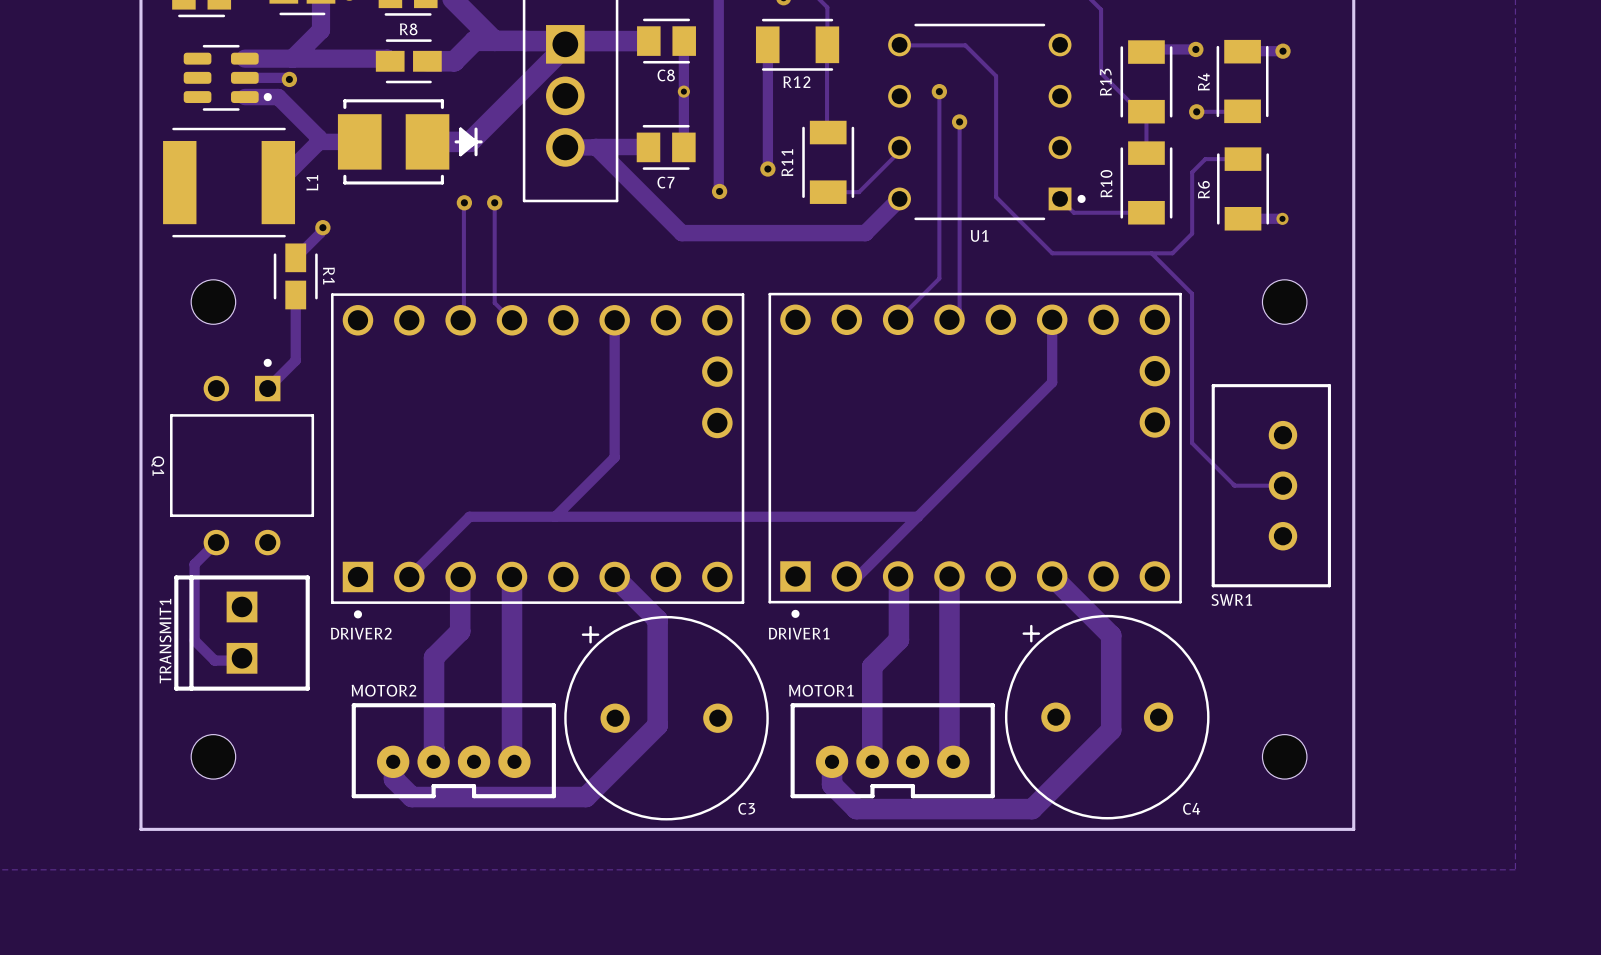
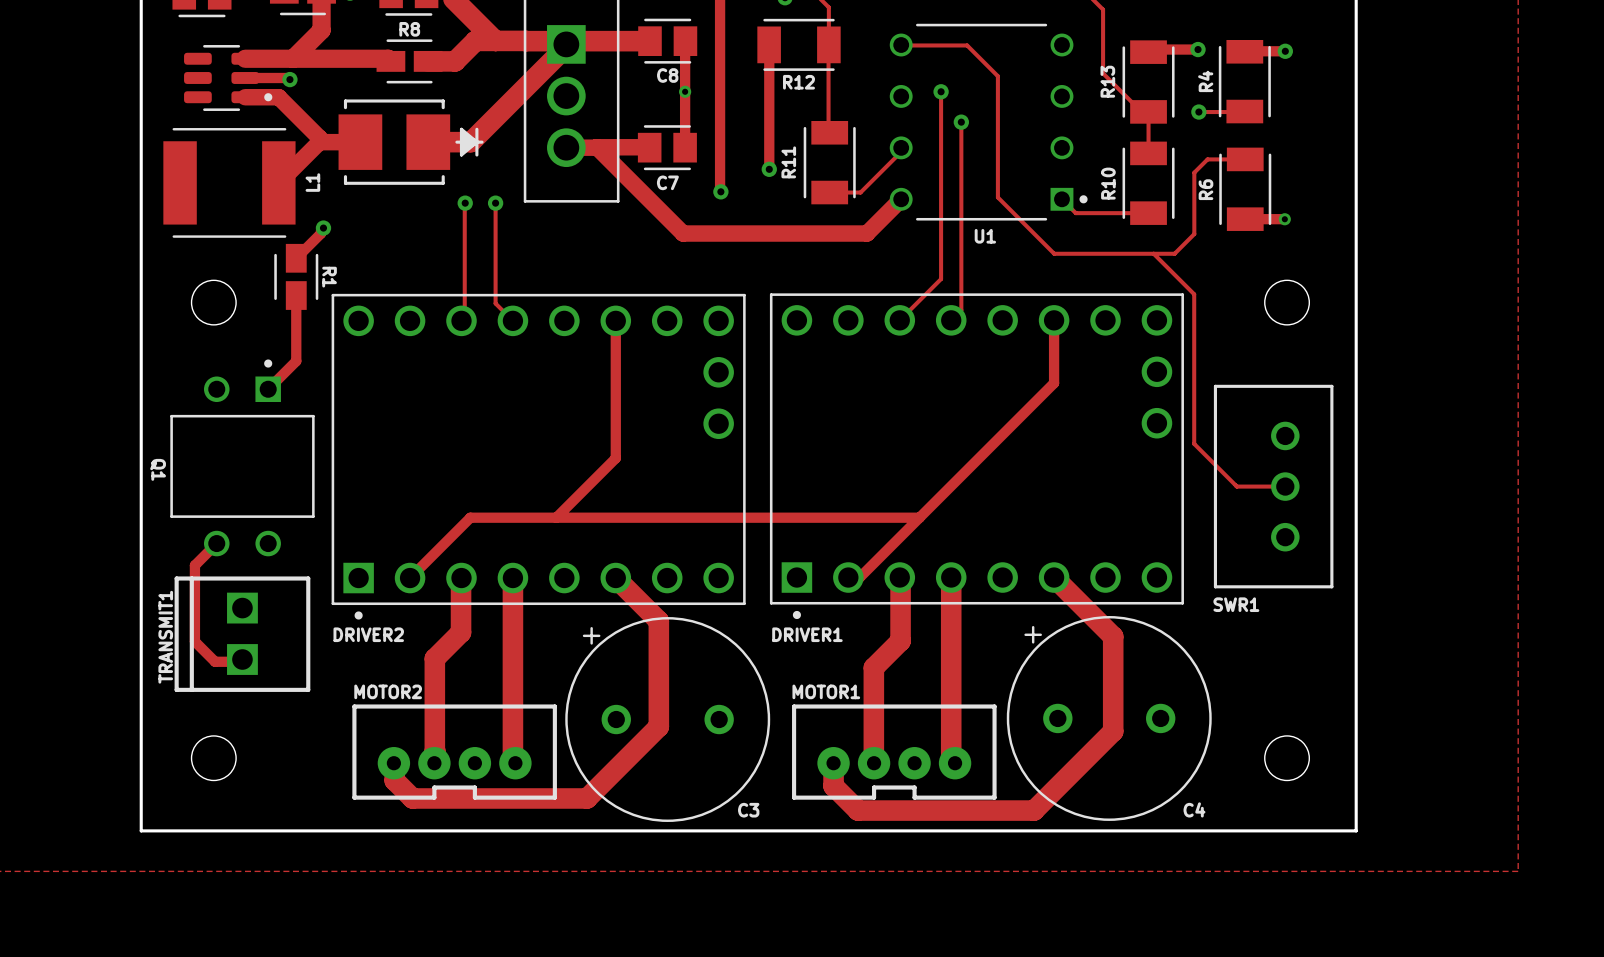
SWR1 name: SWR1 (1231, 599) -> none
text: none -> SWR1 (1236, 604)

